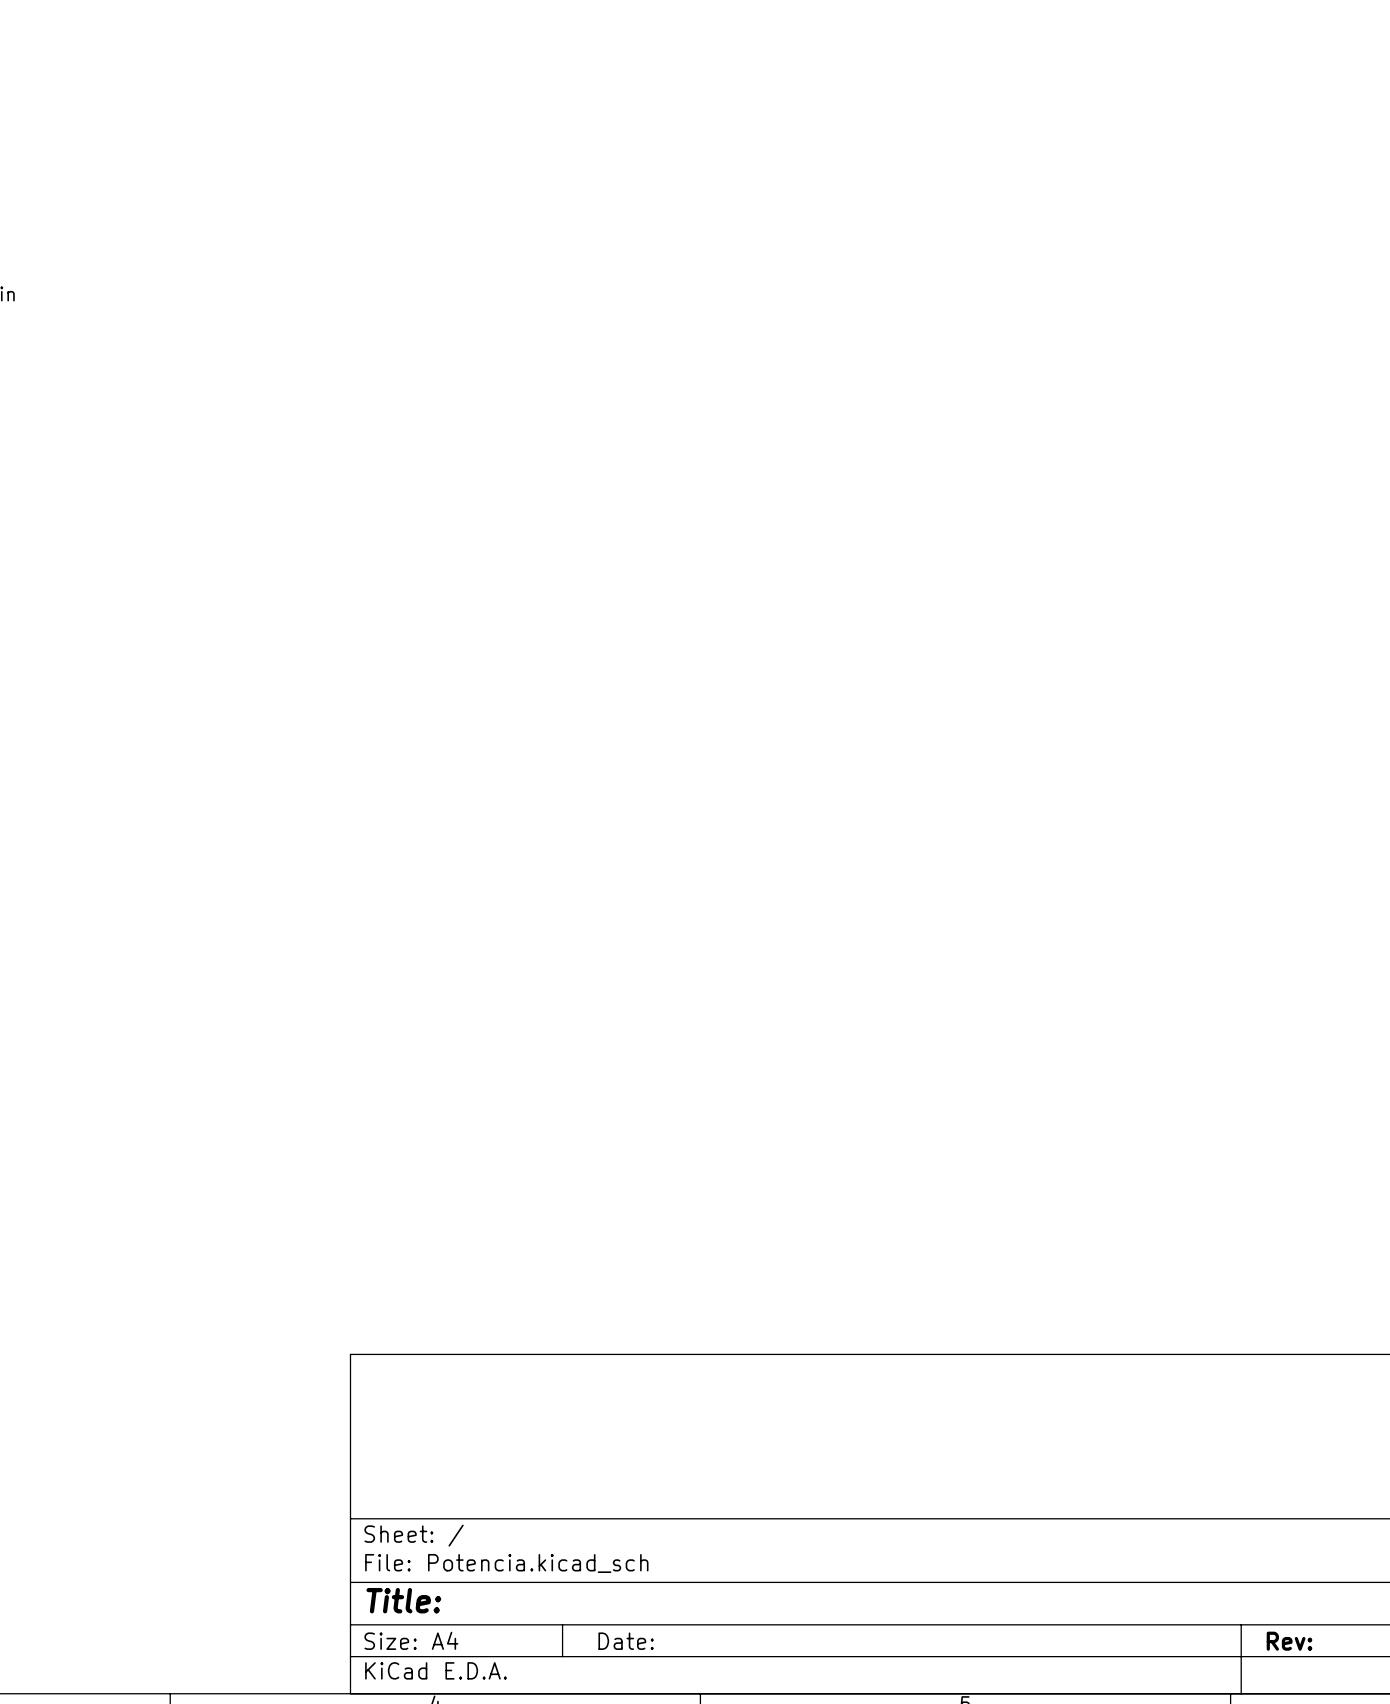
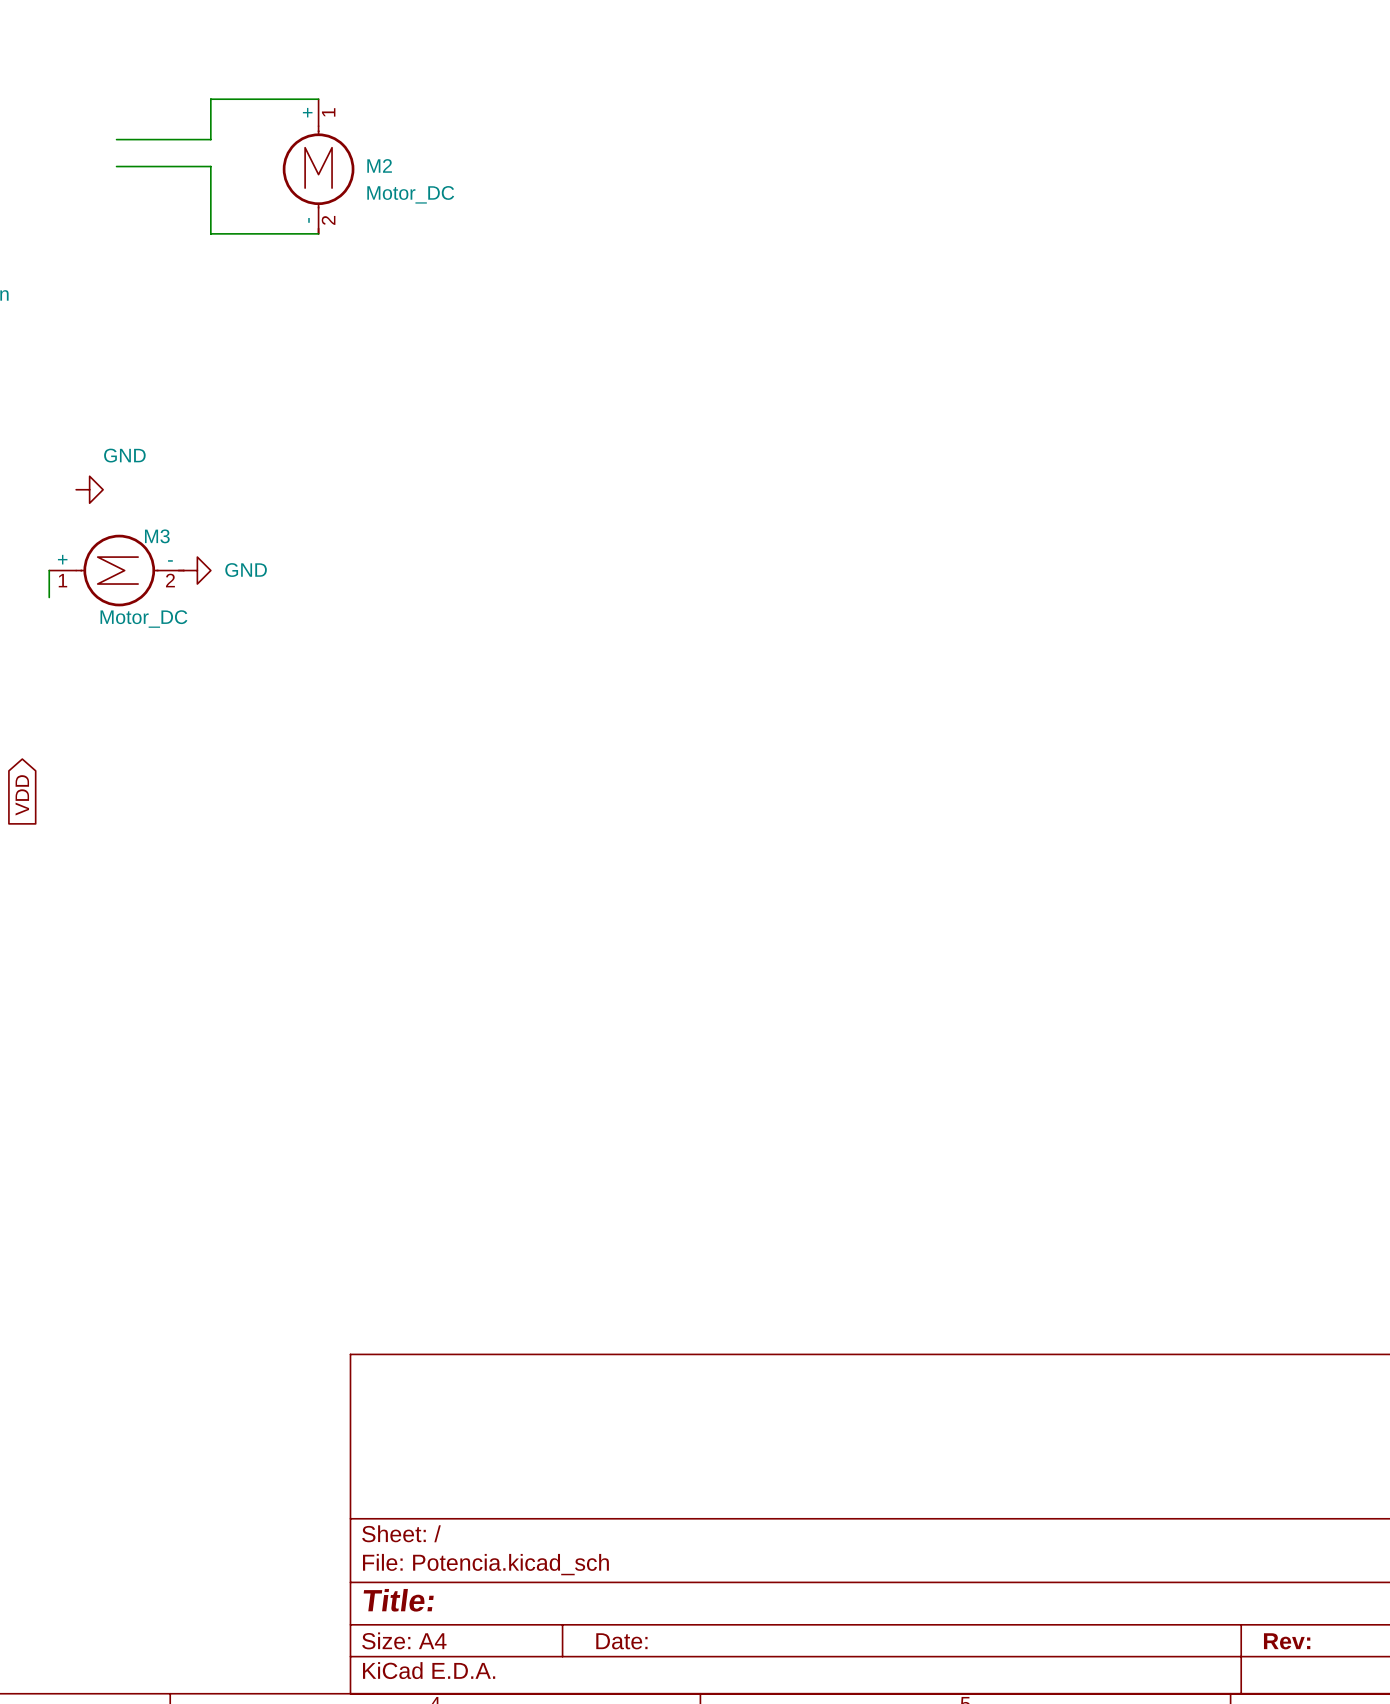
wire: none -> (318, 99) (210, 99) (210, 139) (116, 139)
wire: none -> (116, 166) (210, 166) (210, 233) (318, 233)
M2: none -> Motor_DC (318, 166)
power symbol: none -> GND (89, 489)
wire: none -> (49, 570) (49, 597)
M3: none -> Motor_DC (116, 570)
power symbol: none -> GND (197, 570)
global label: none -> VDD (22, 795)

